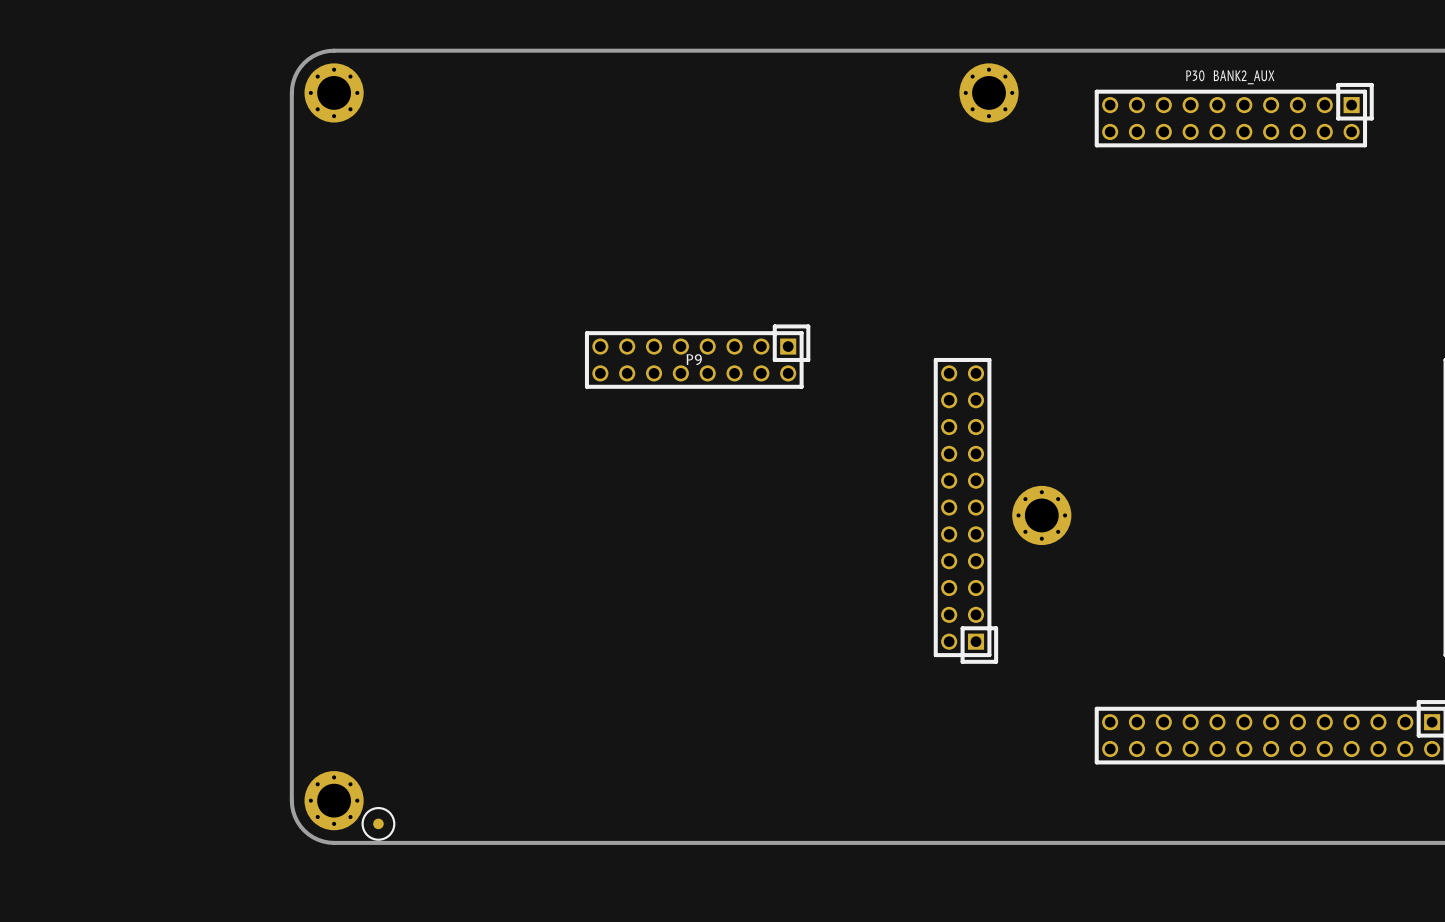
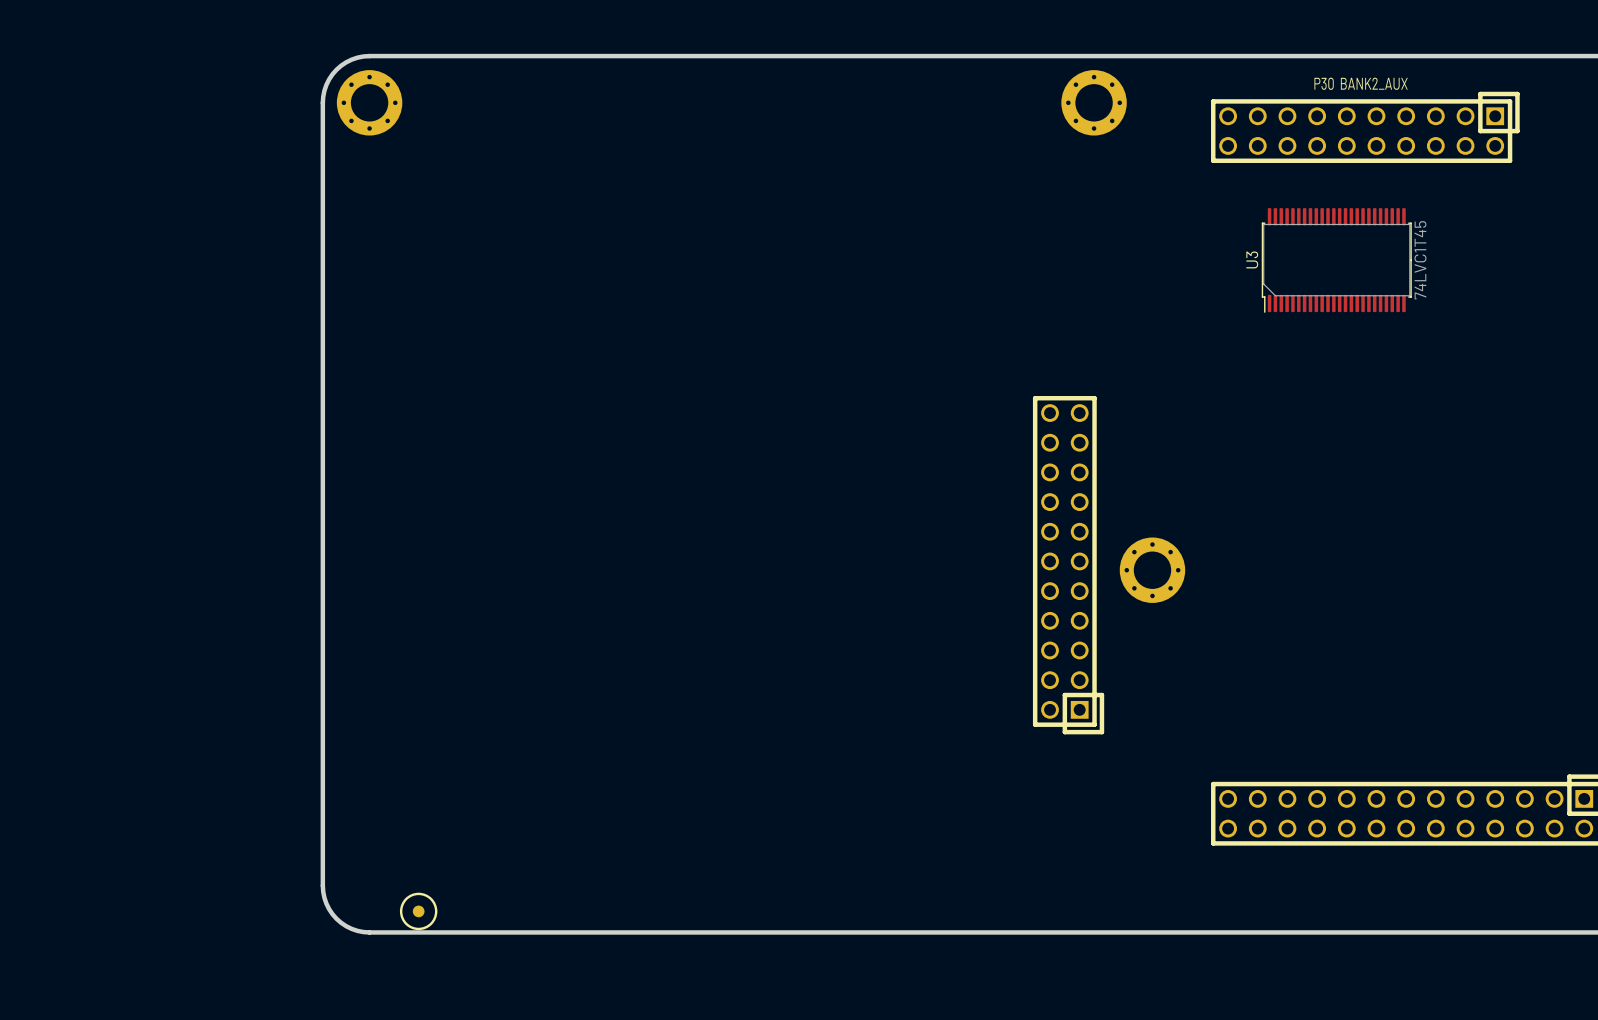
U3: none -> 74LVC1T45 (1336, 260)
P9: (697, 356) -> none
part: (334, 800) -> none

